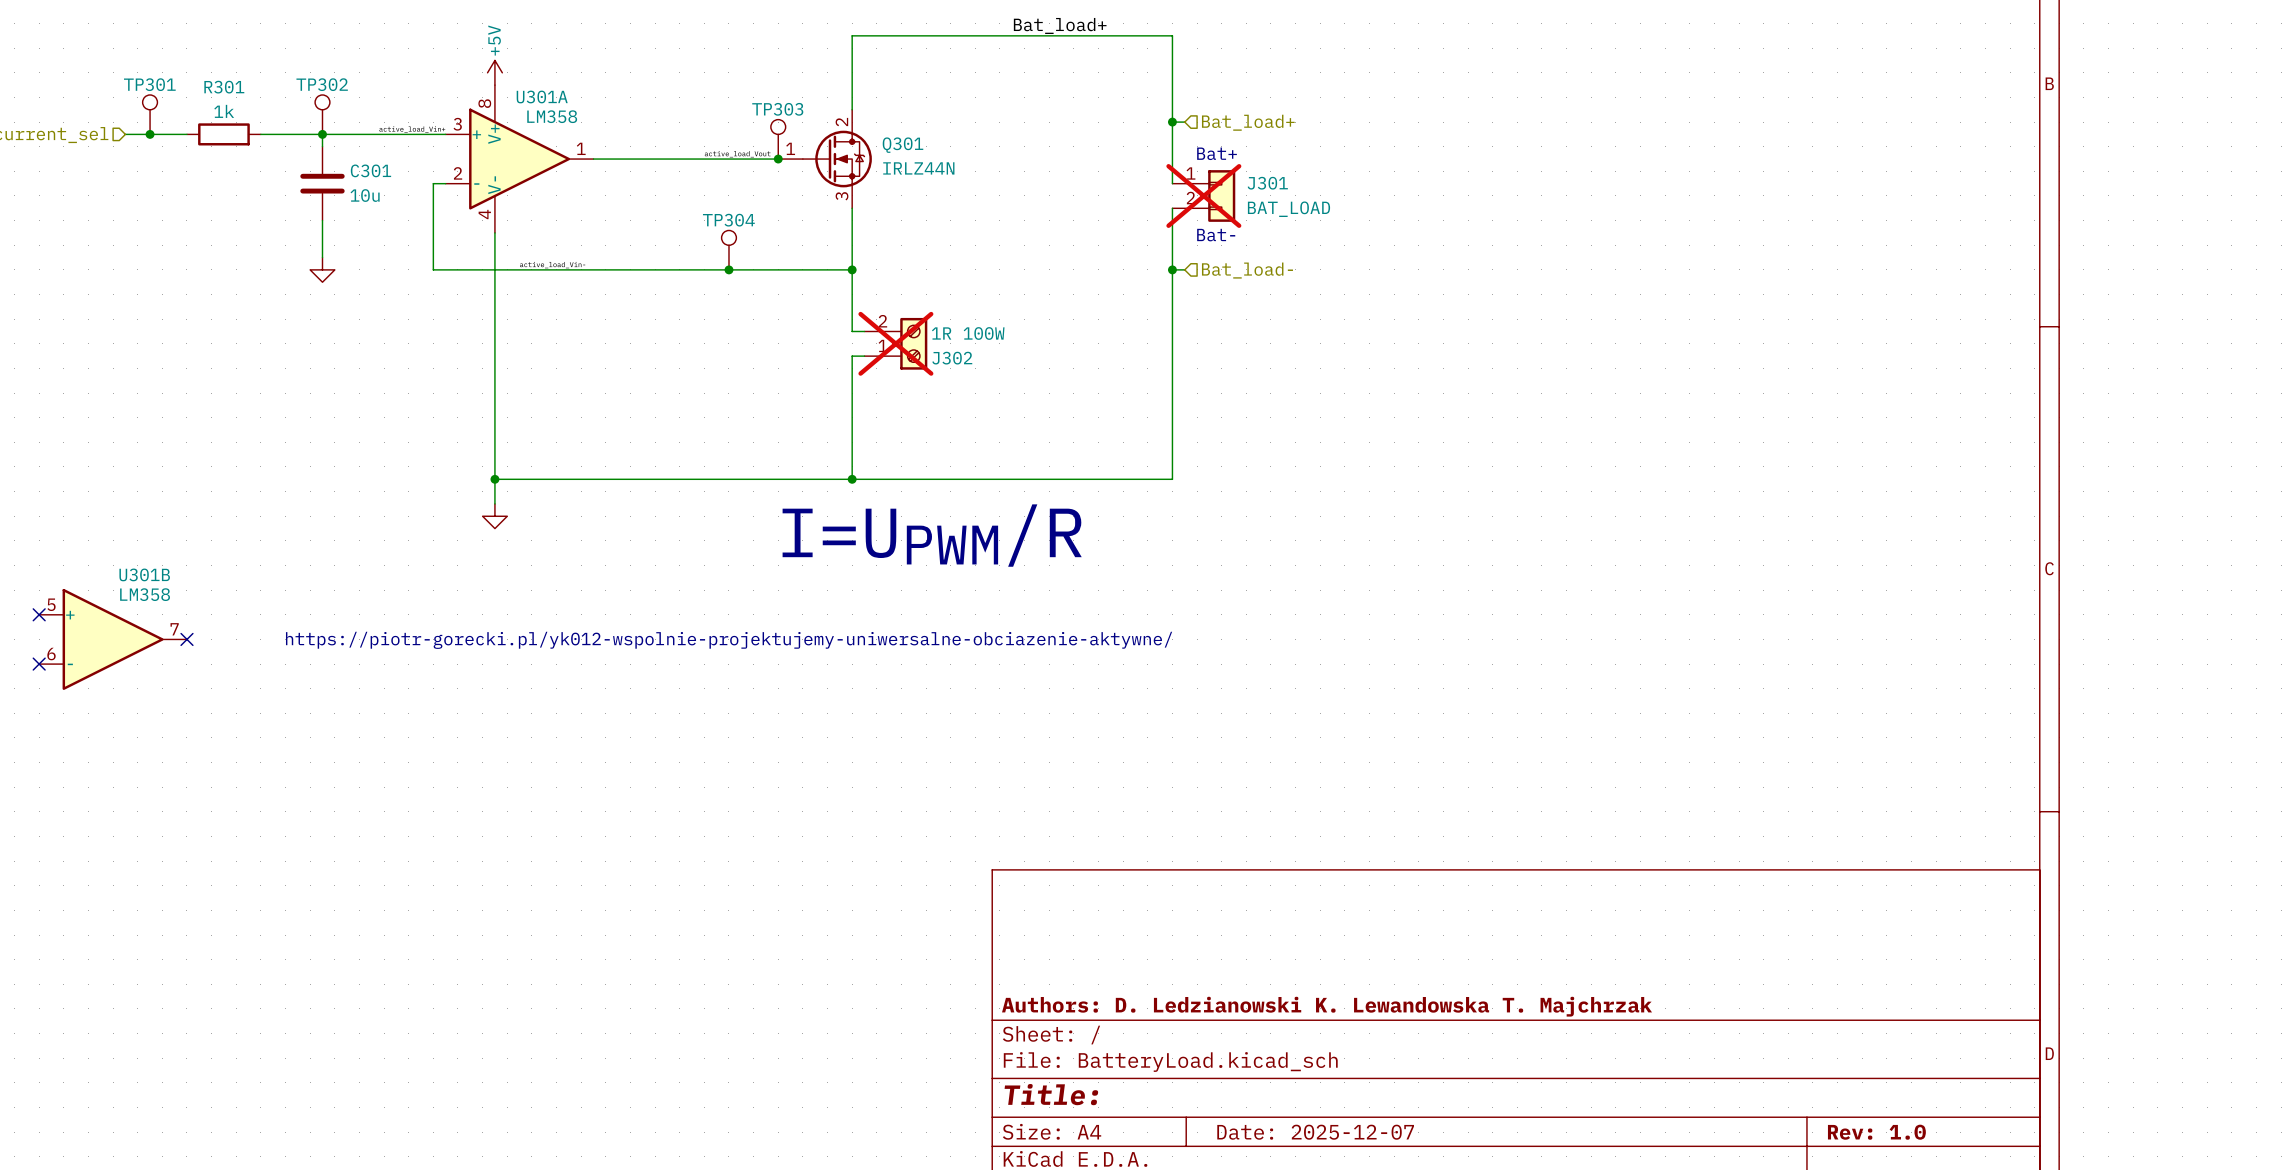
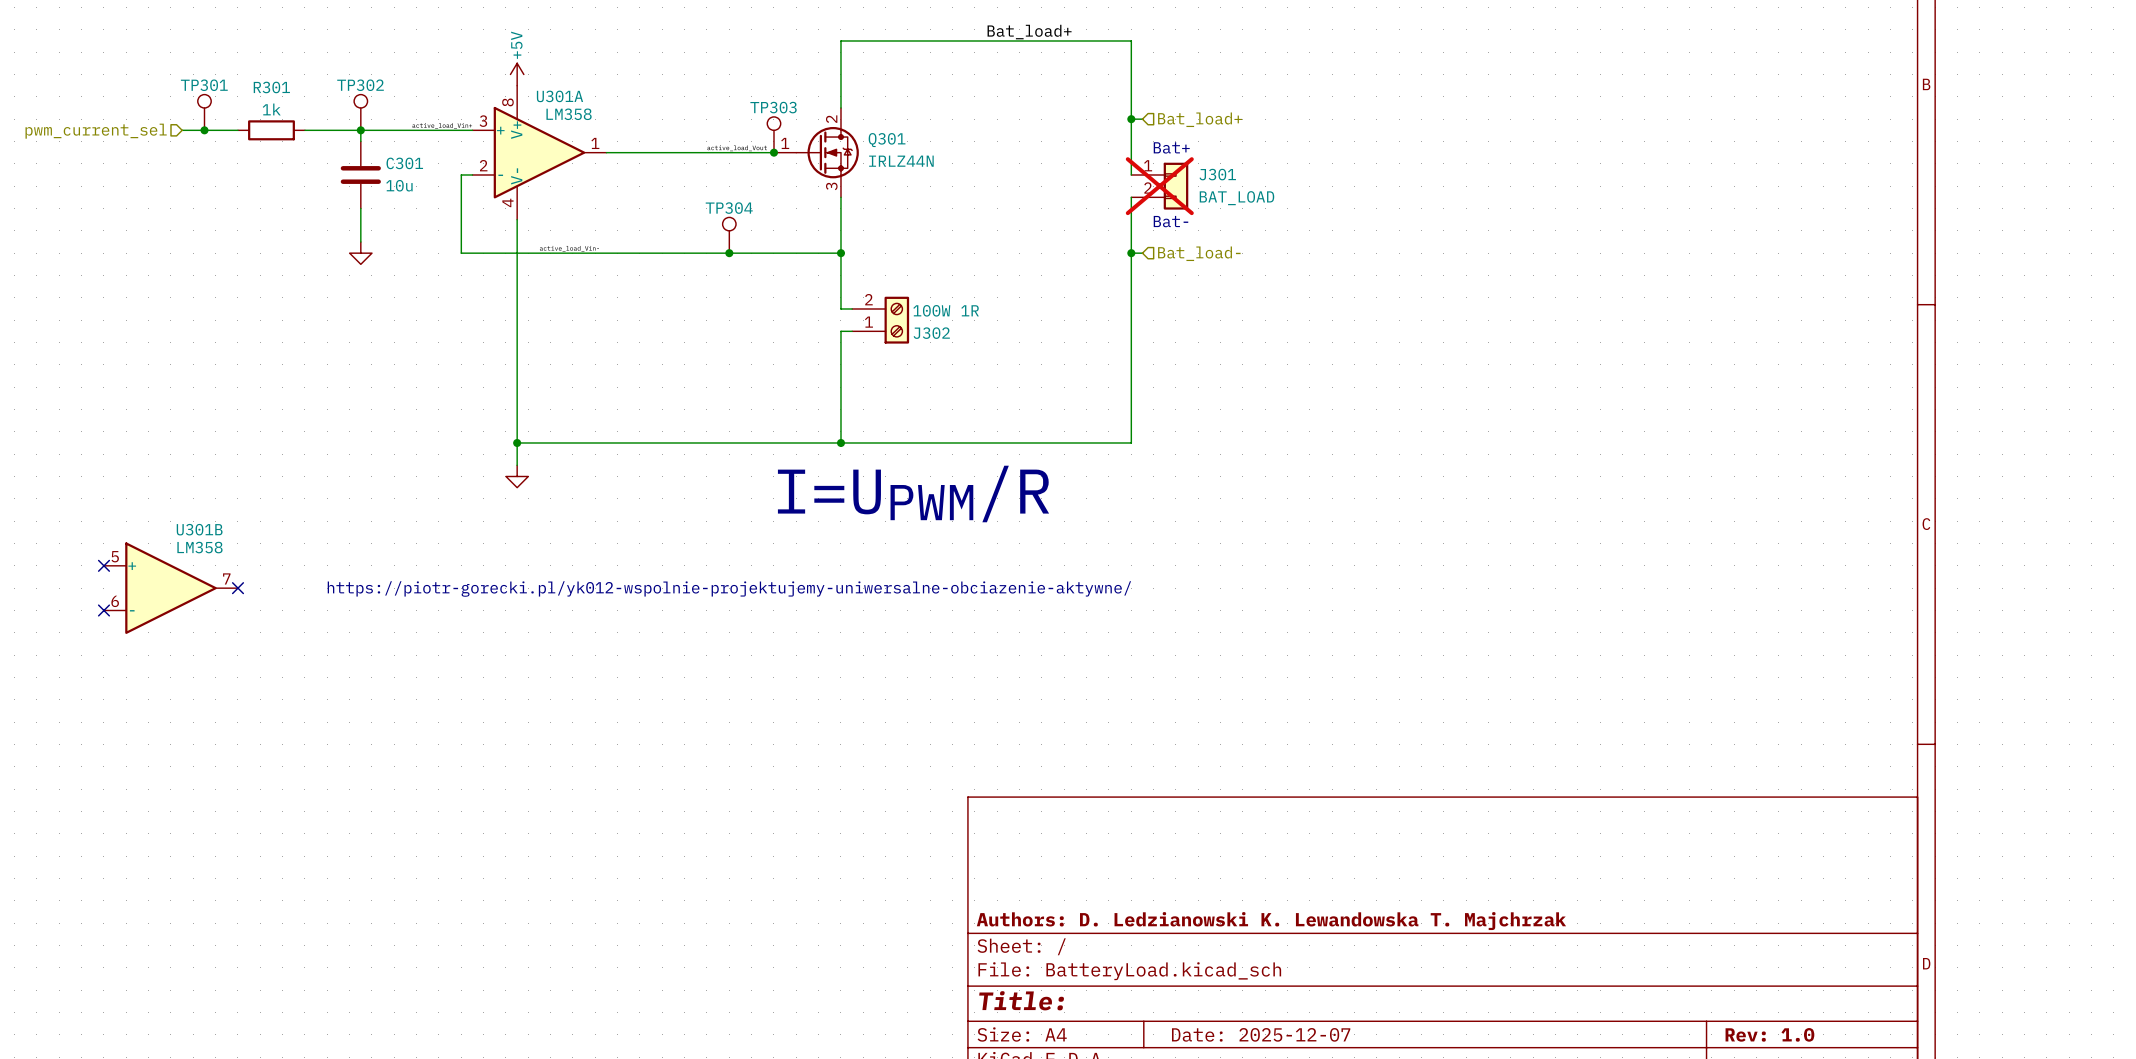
J302 value: 1R 100W (968, 333) -> 100W 1R (946, 310)
J302 do-not-place cross: (895, 343) -> none

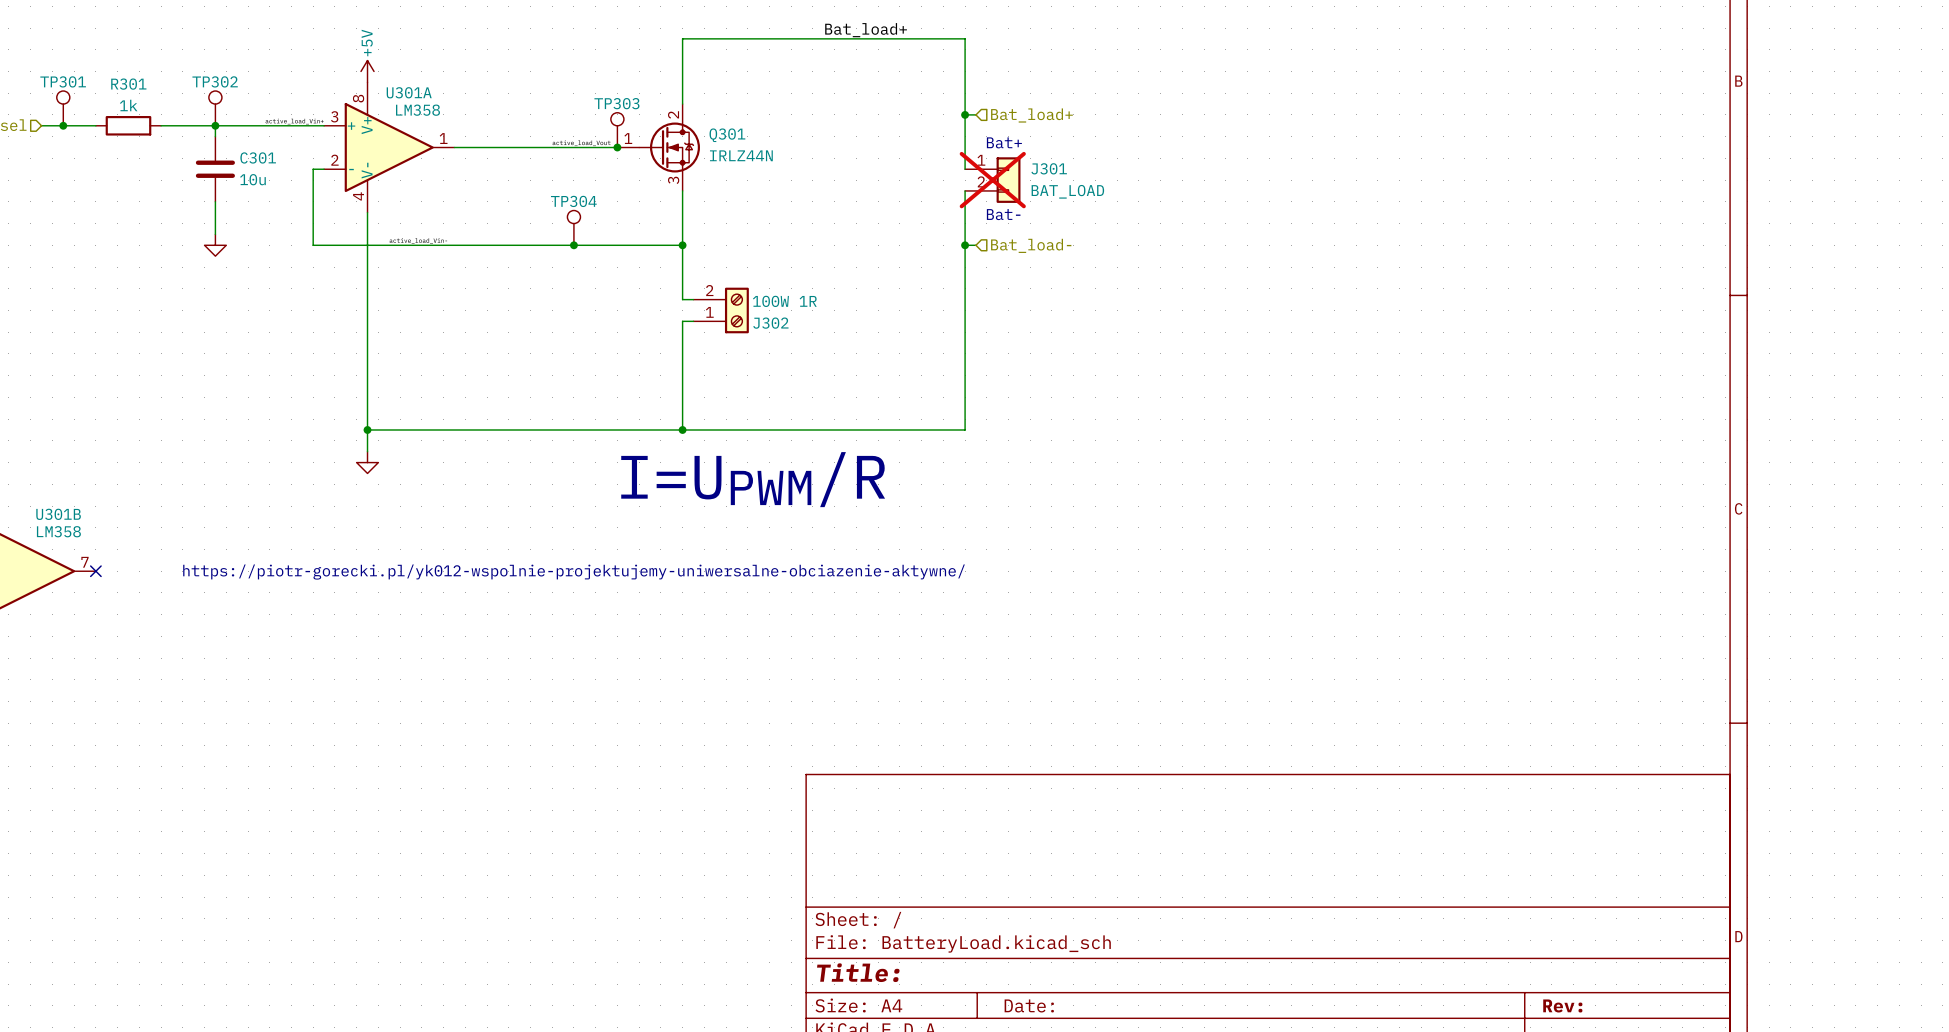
title block: Authors: D. Ledzianowski K. Lewandowska T. Majchrzak (1271, 921) -> none
title block: Date: 2025-12-07 (1261, 1034) -> Date: (1029, 1005)
title block: Rev: 1.0 (1769, 1034) -> Rev: (1562, 1005)

